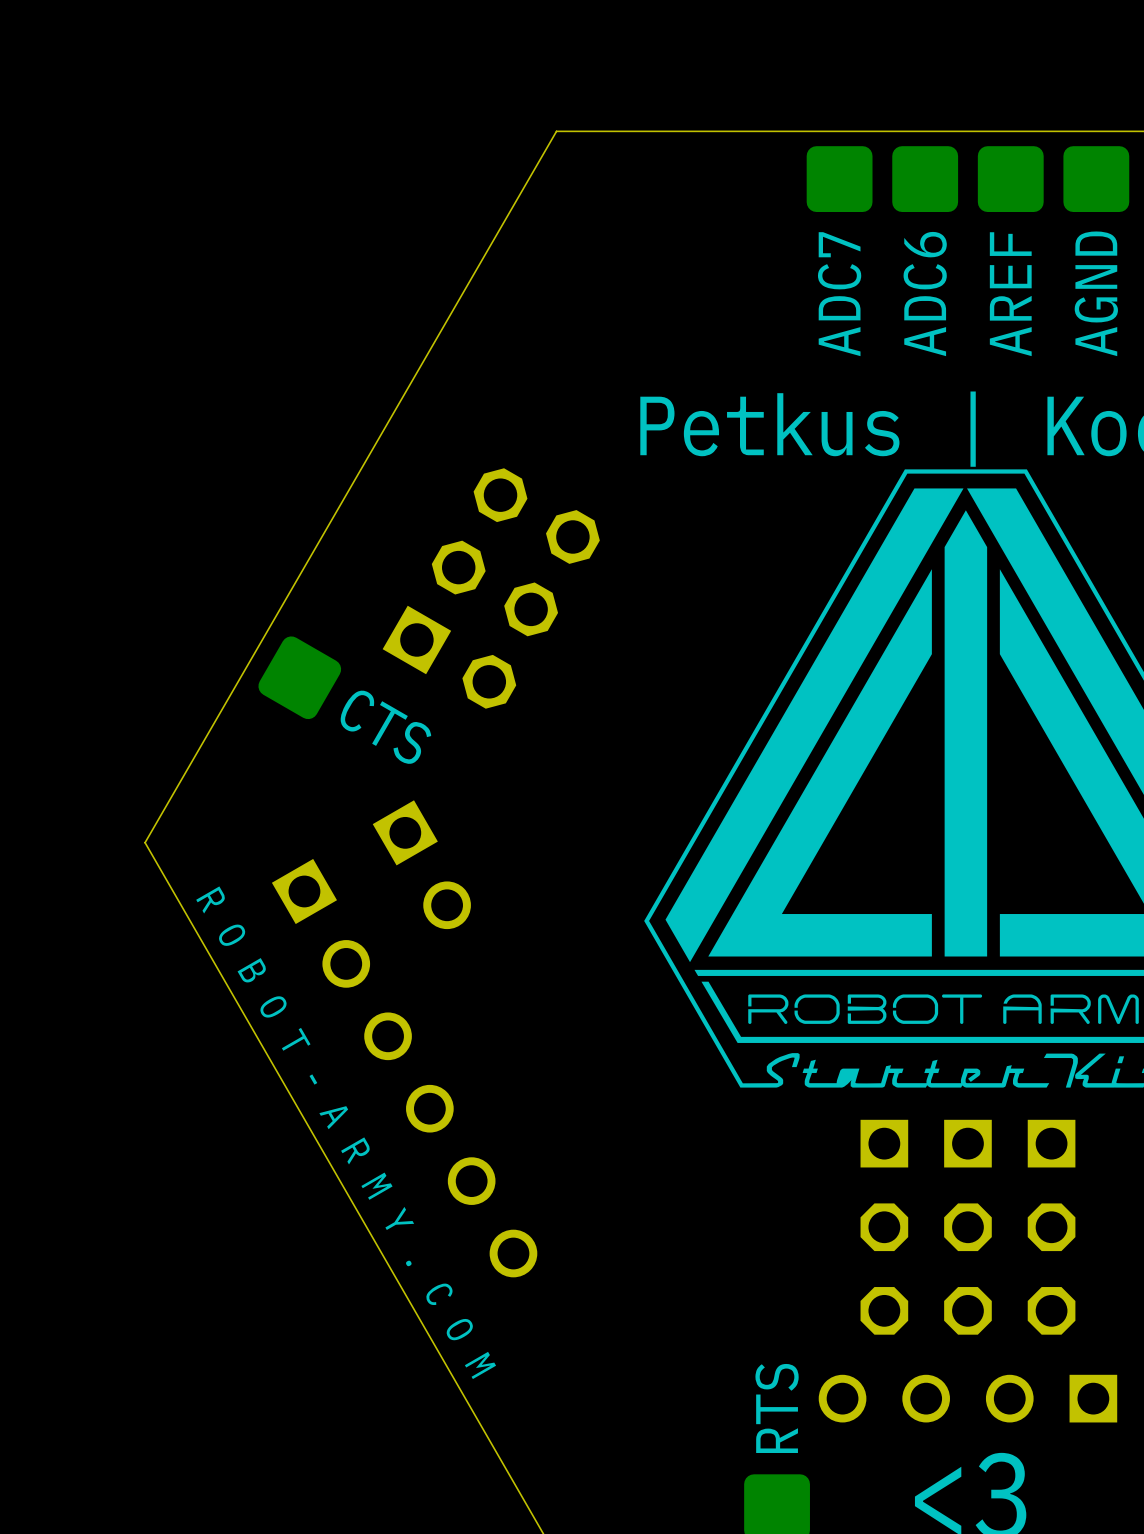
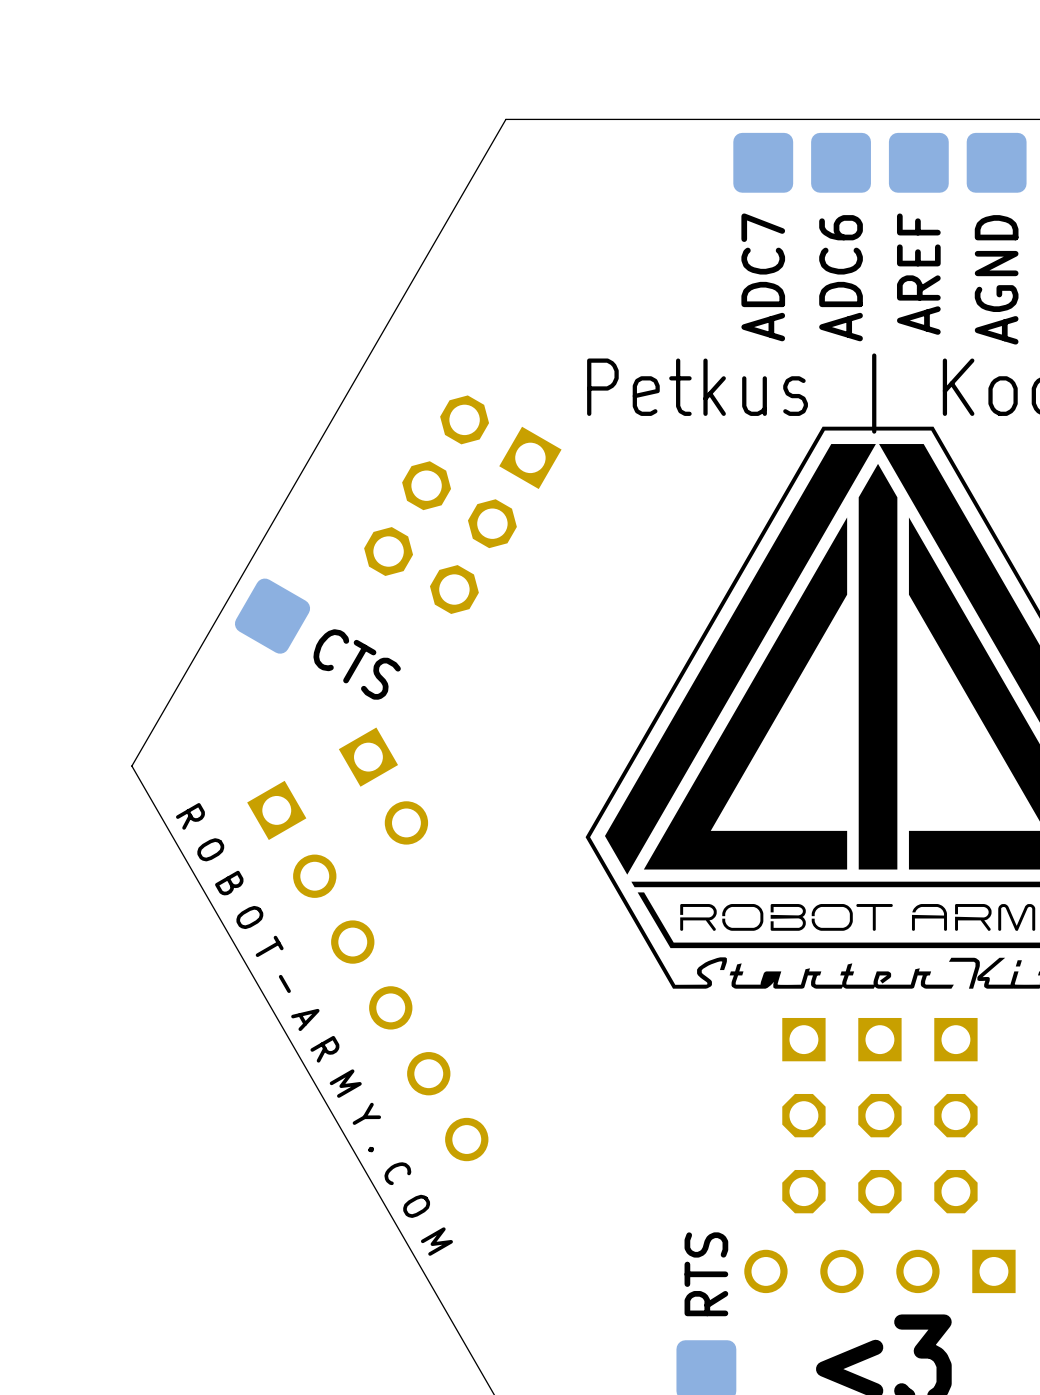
part rotation: 0° (491, 588) -> 180° (462, 504)

